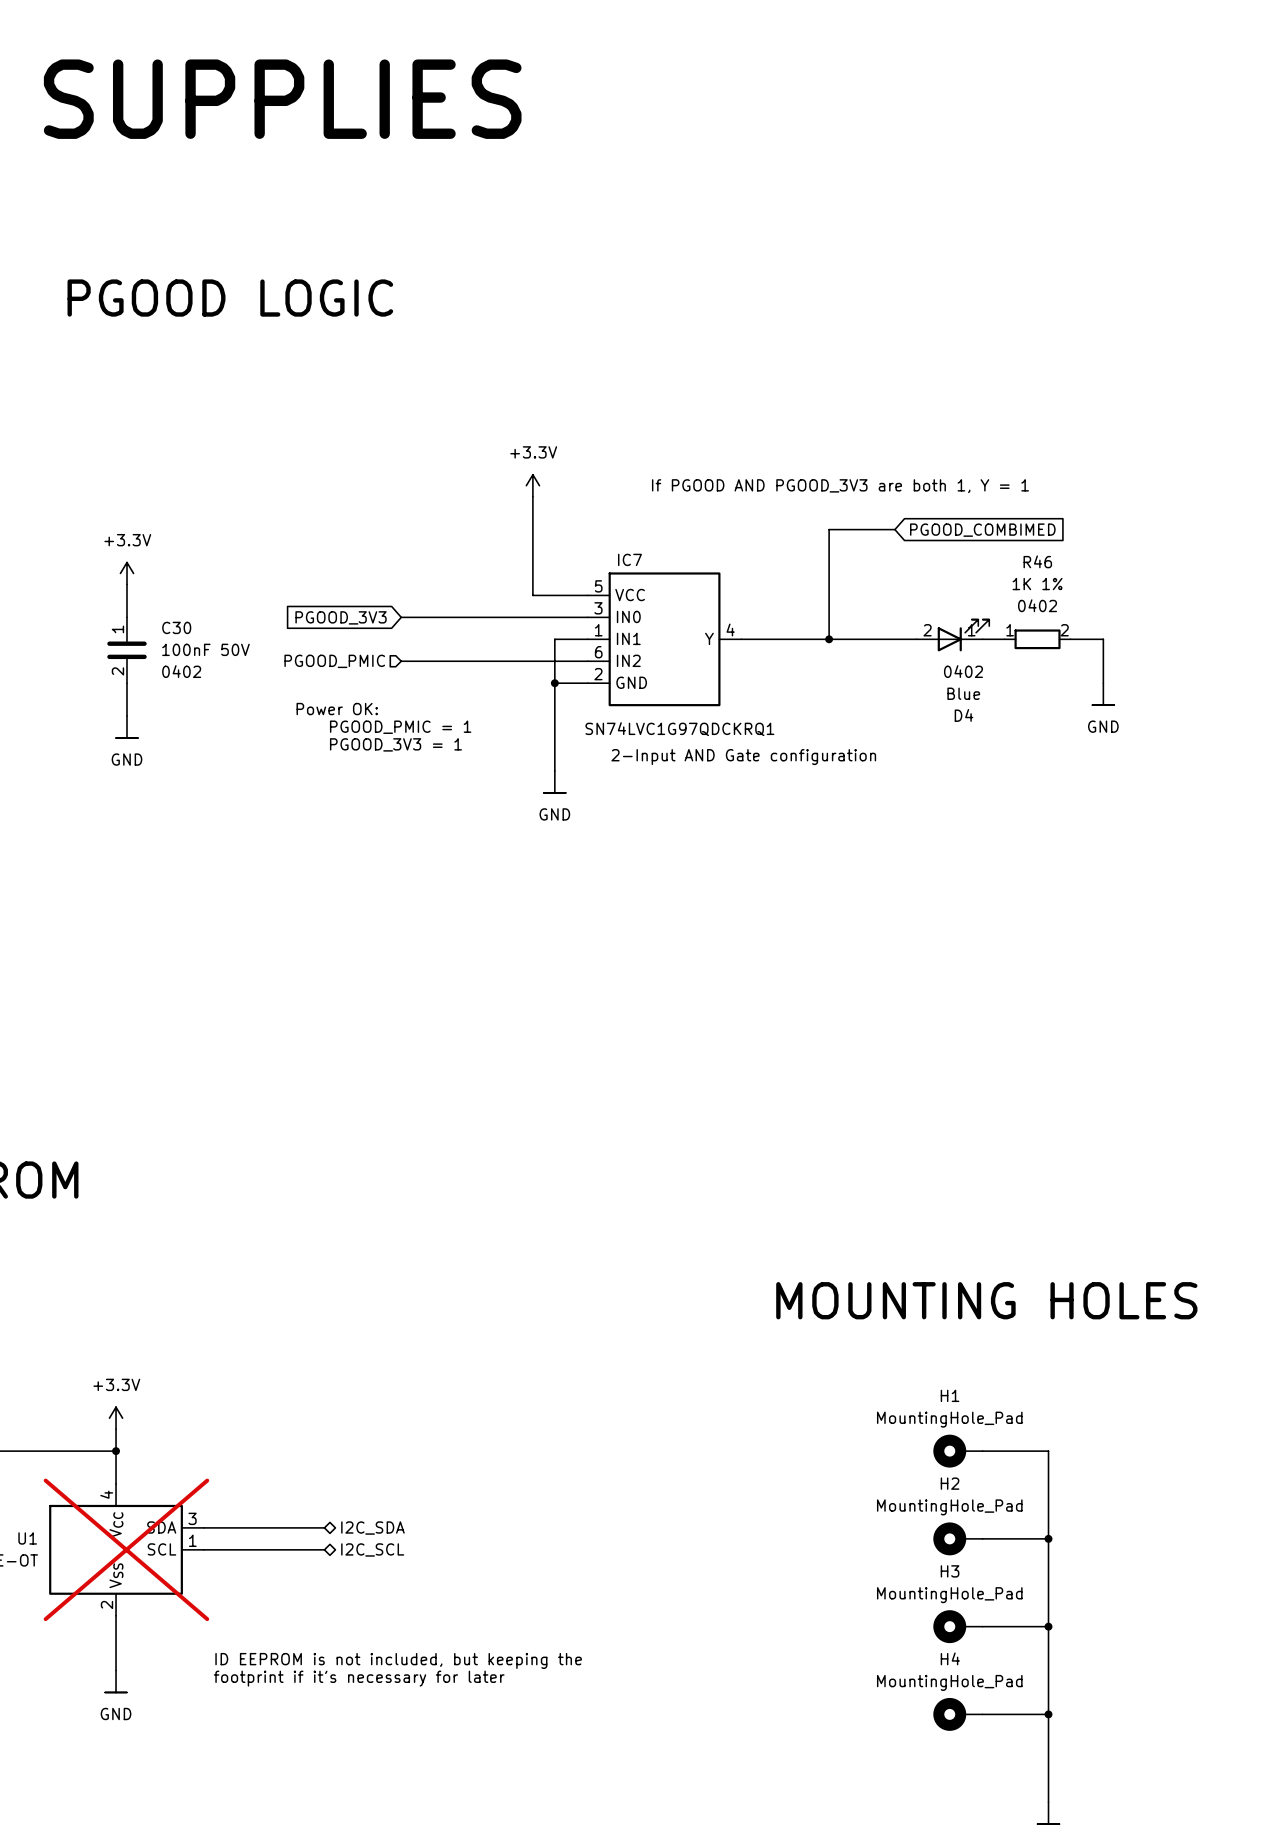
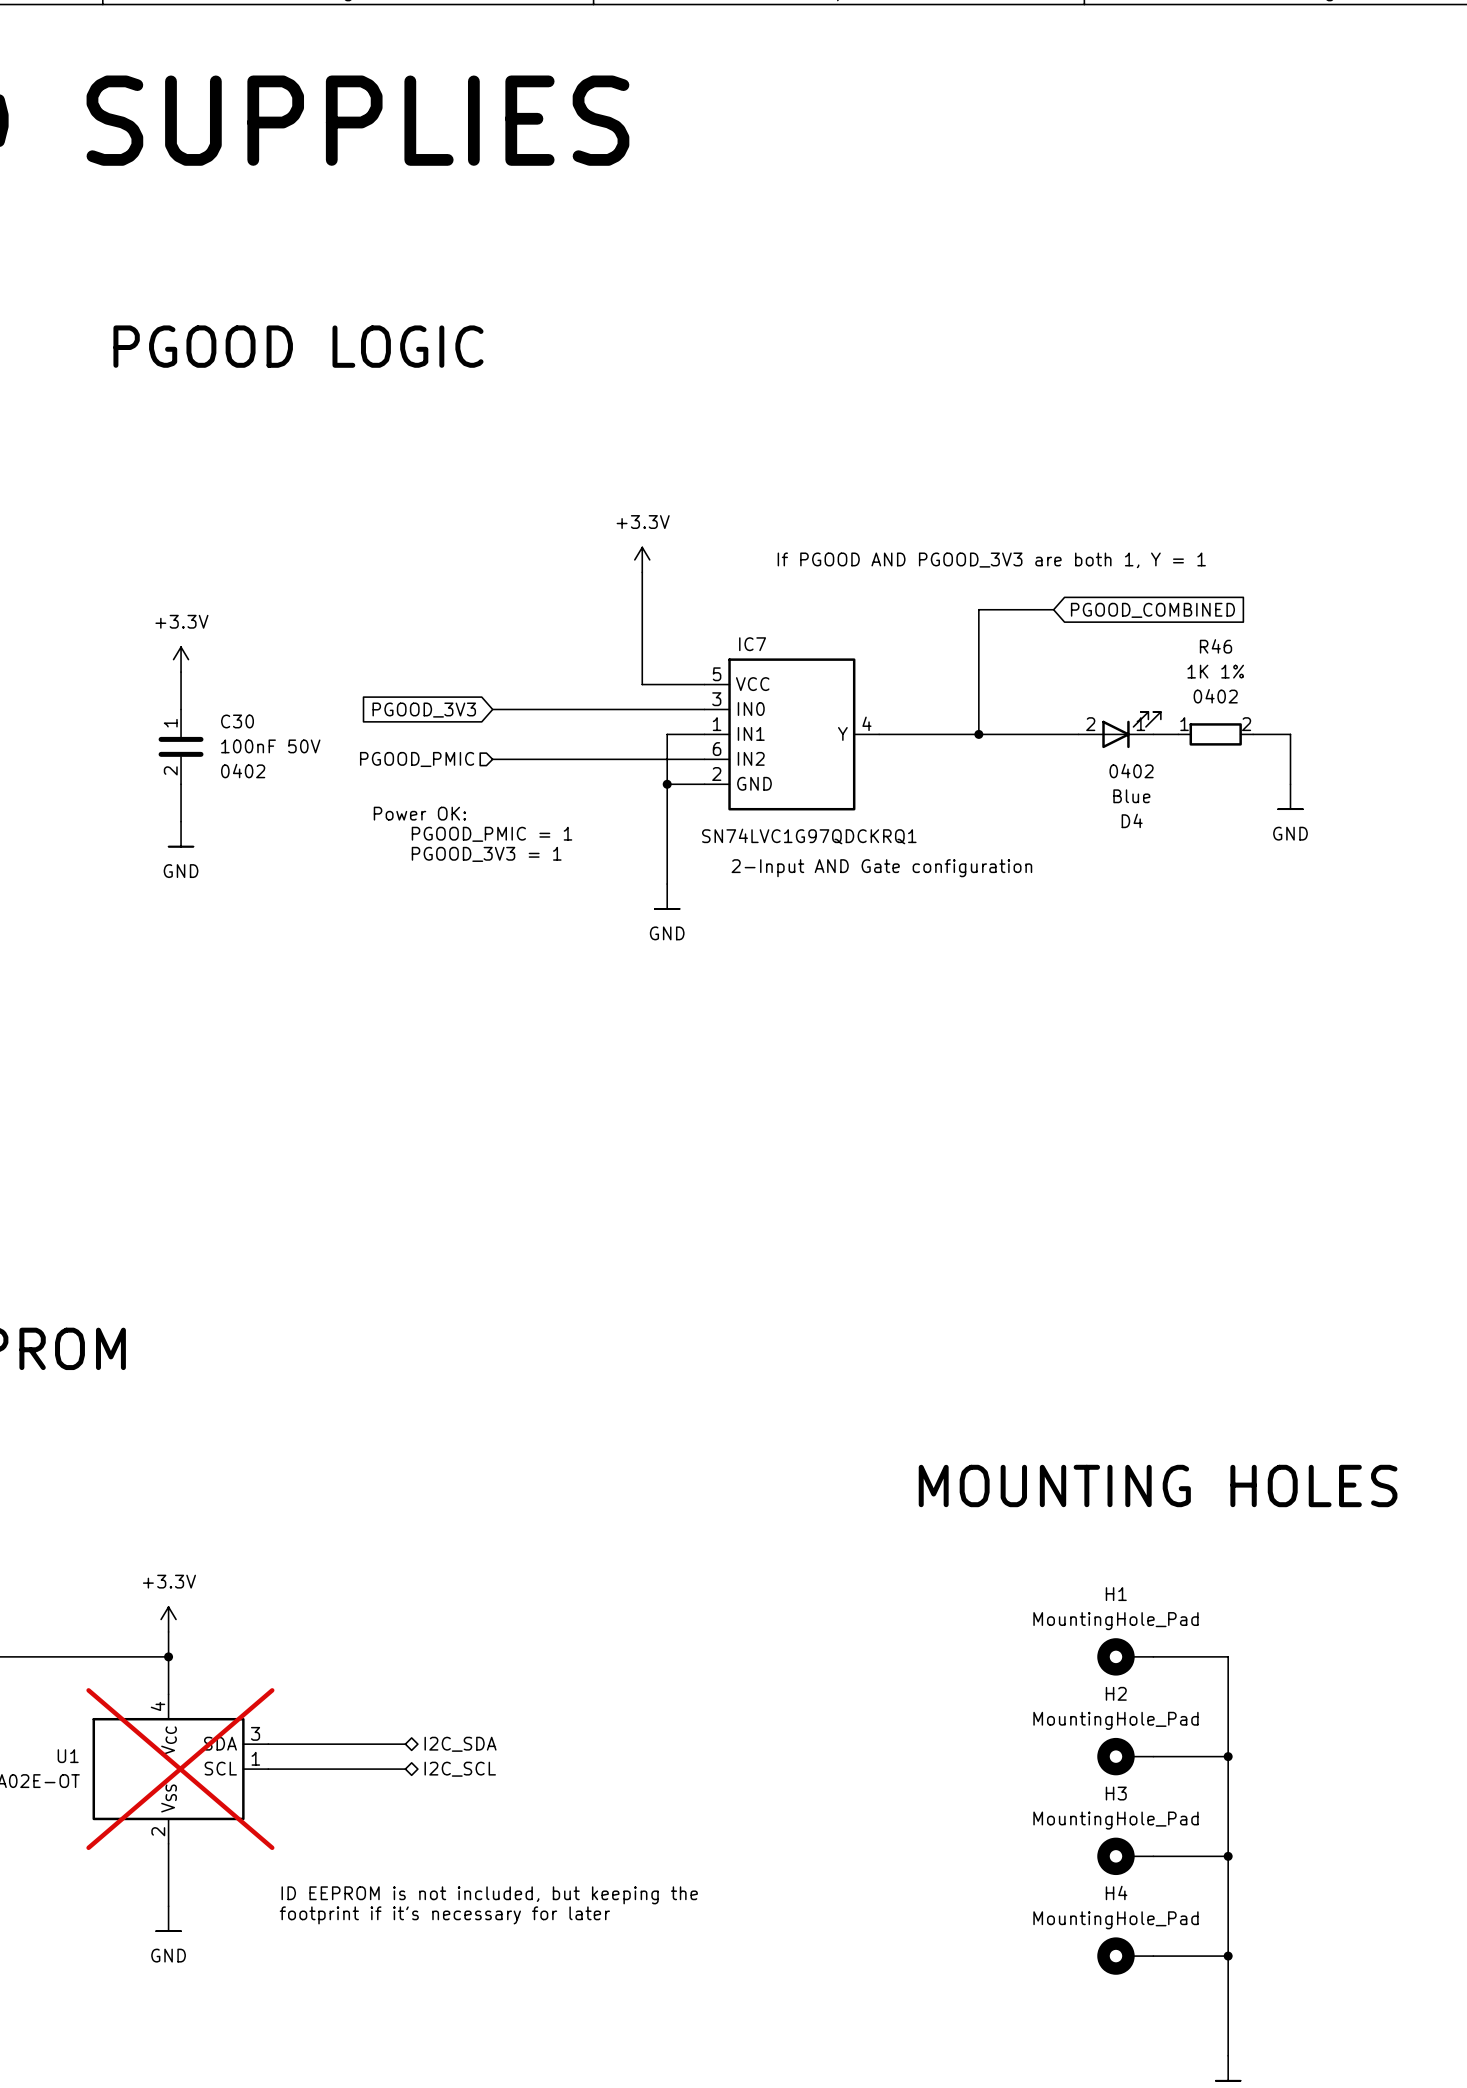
global label: PGOOD_COMBIMED (982, 530) -> PGOOD_COMBINED (1152, 610)

